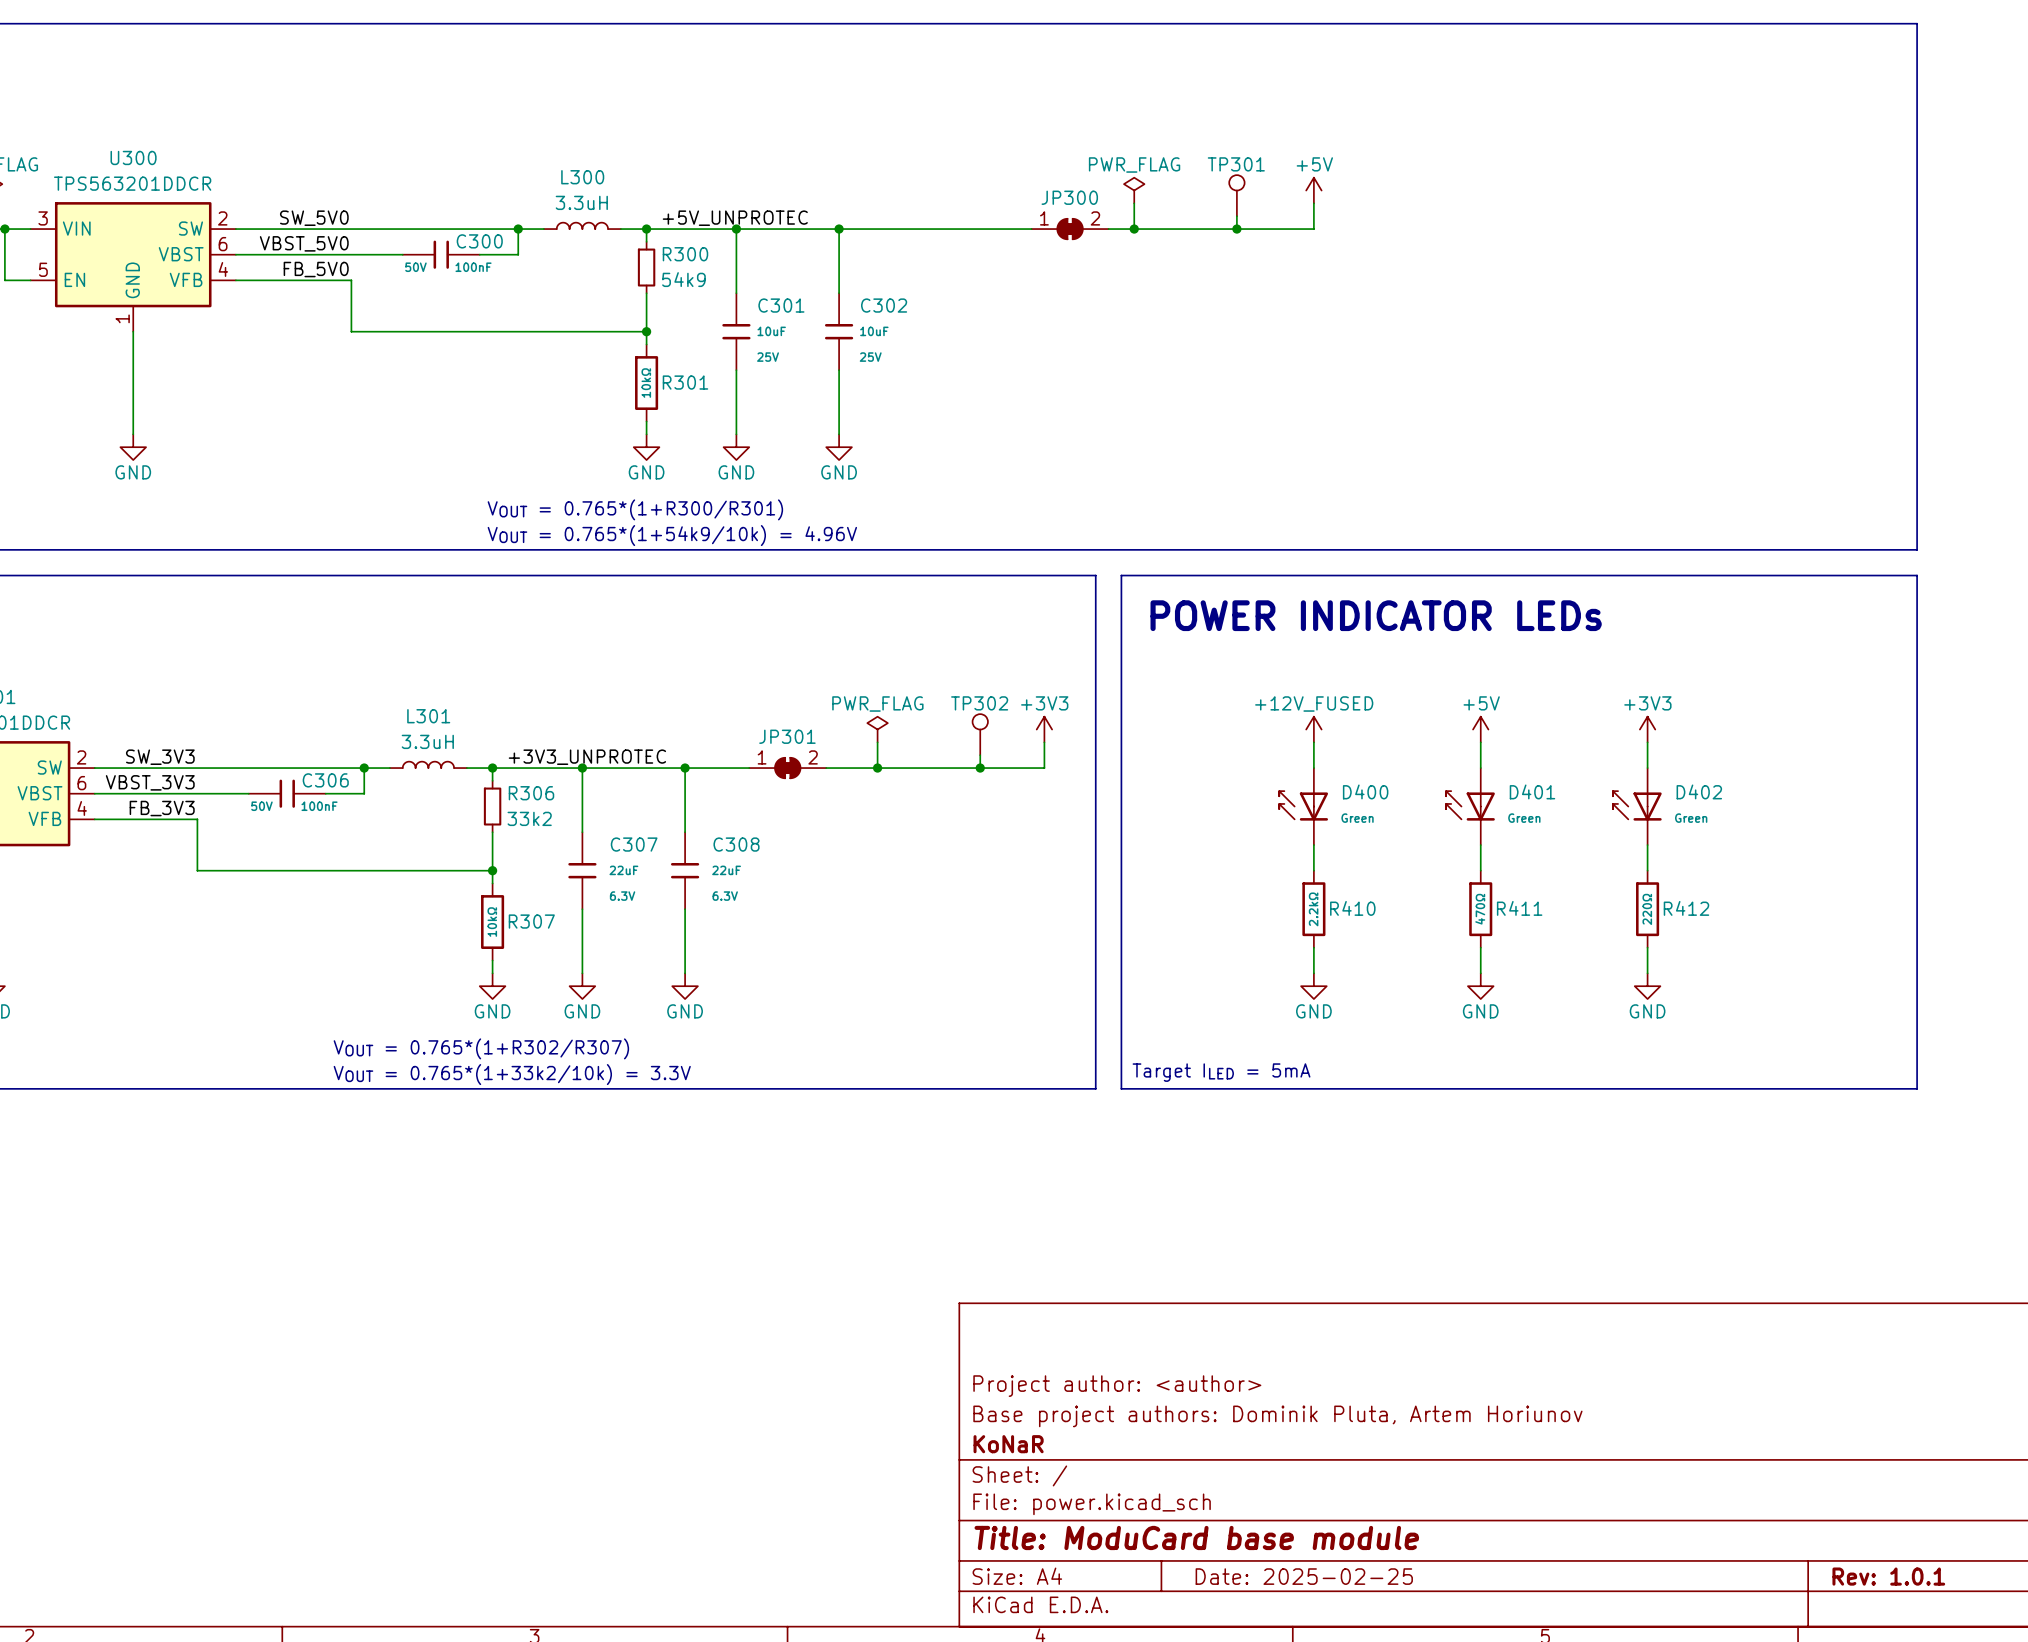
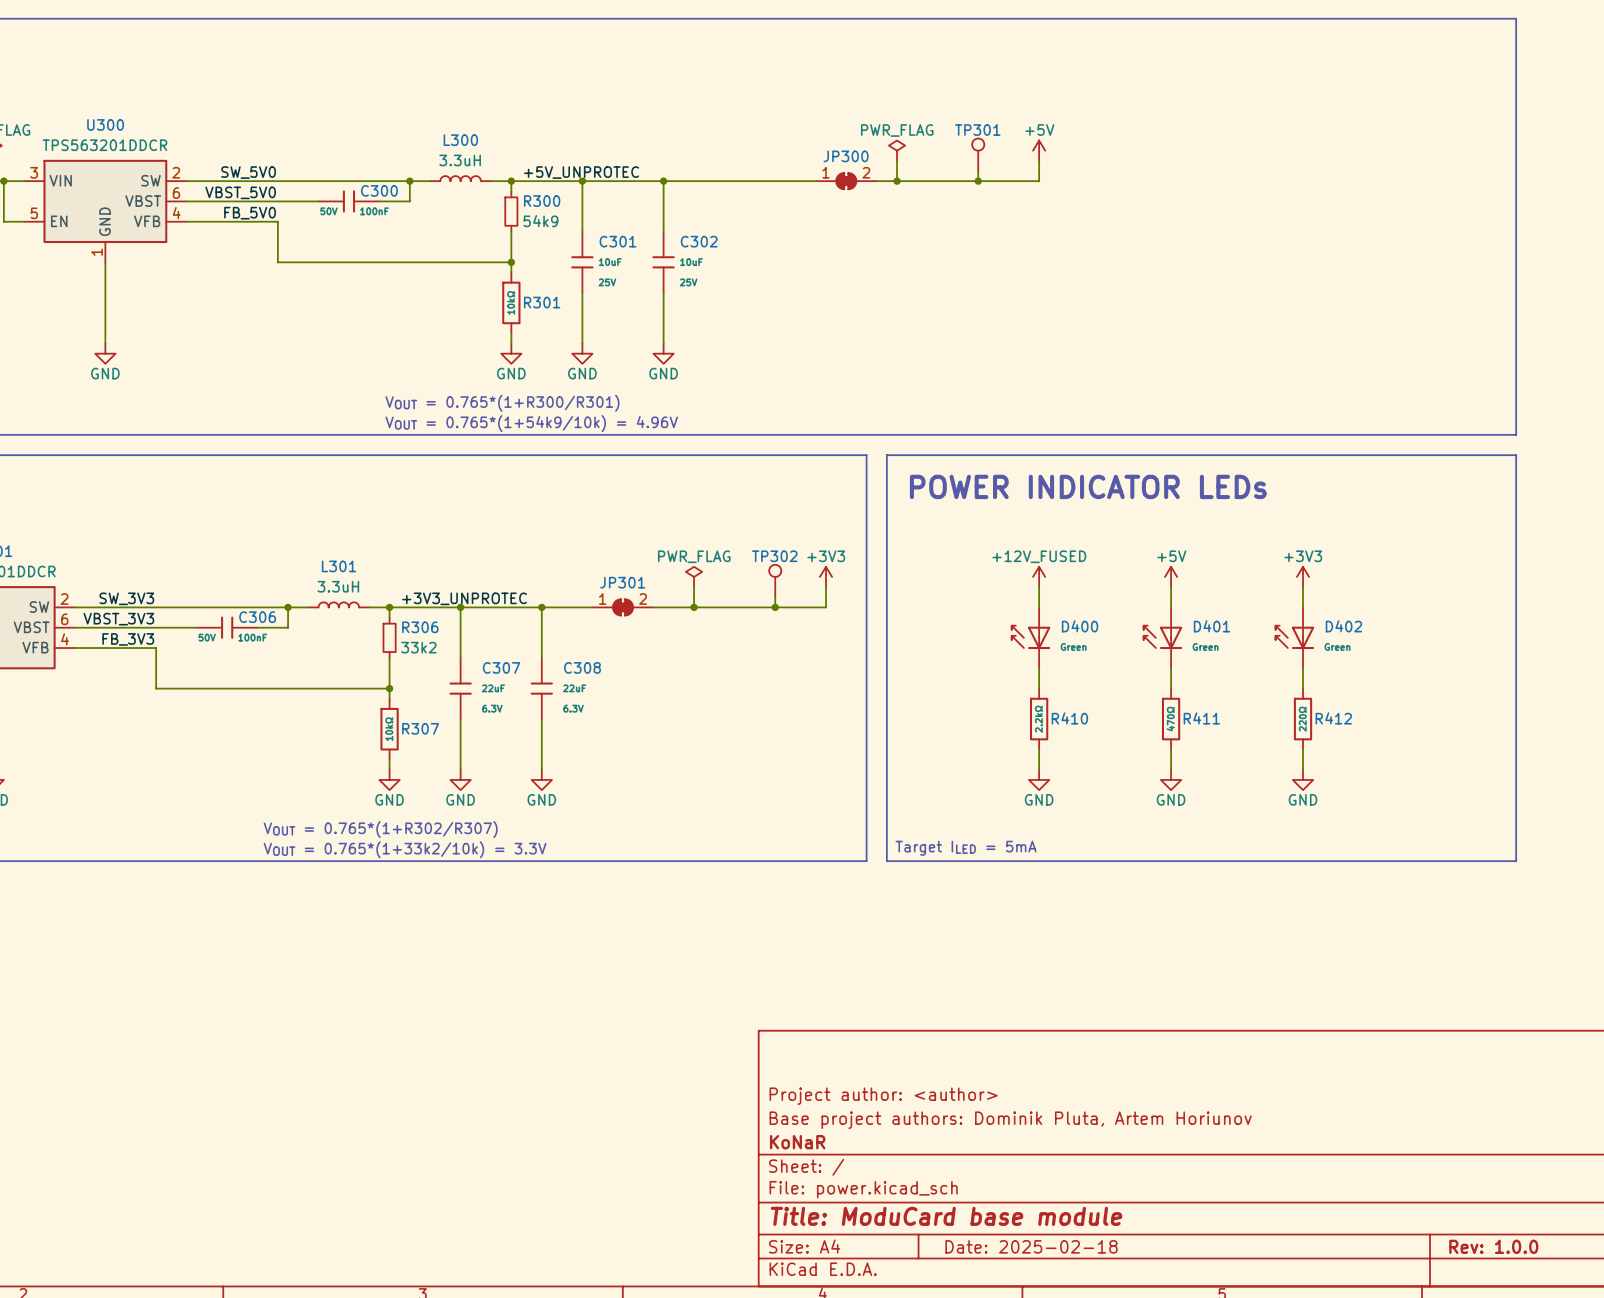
title block: Date: 2025-02-25 (1304, 1576) -> Date: 2025-02-18 (1031, 1246)
title block: Rev: 1.0.1 (1888, 1576) -> Rev: 1.0.0 (1493, 1246)

